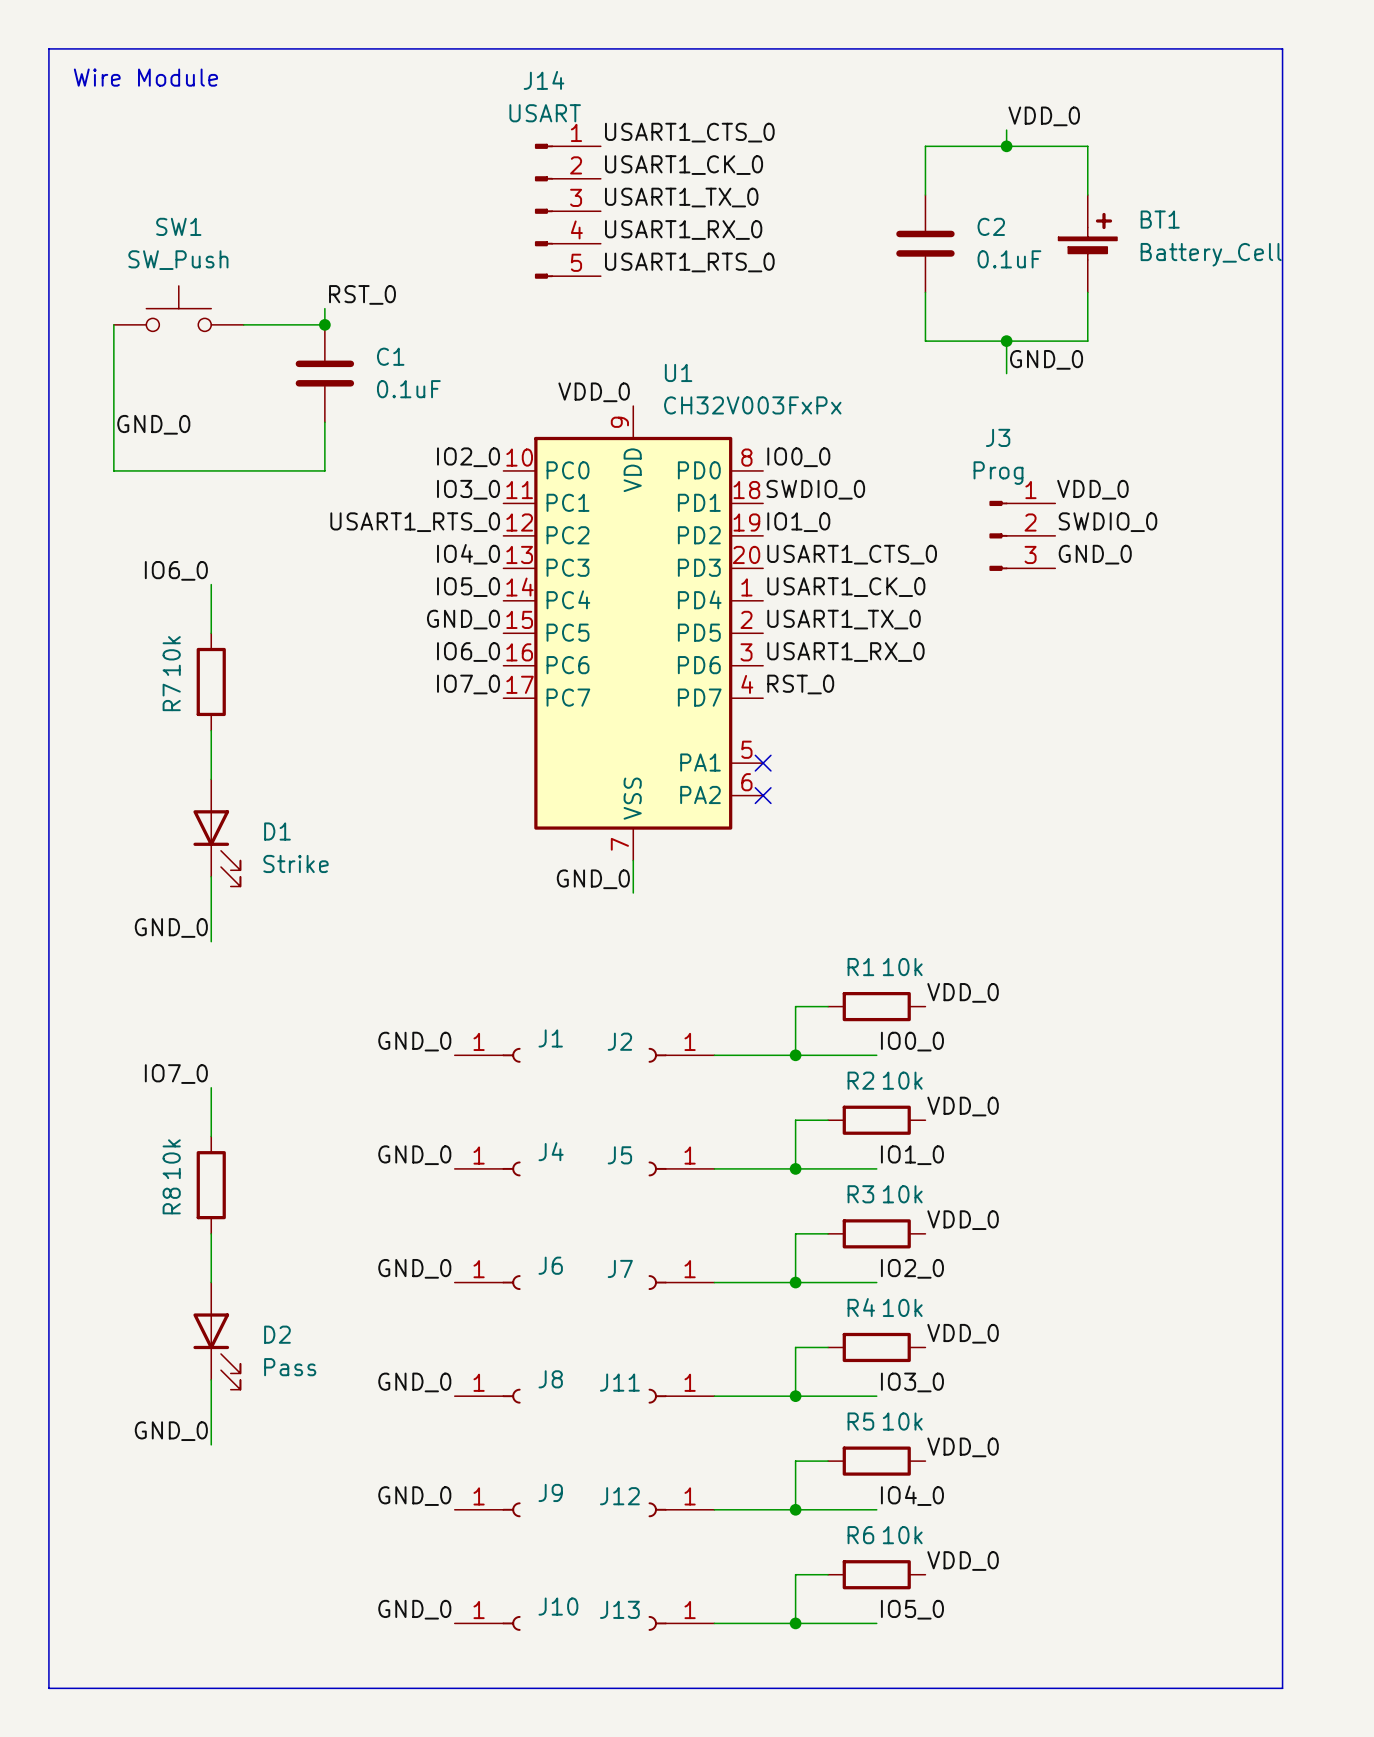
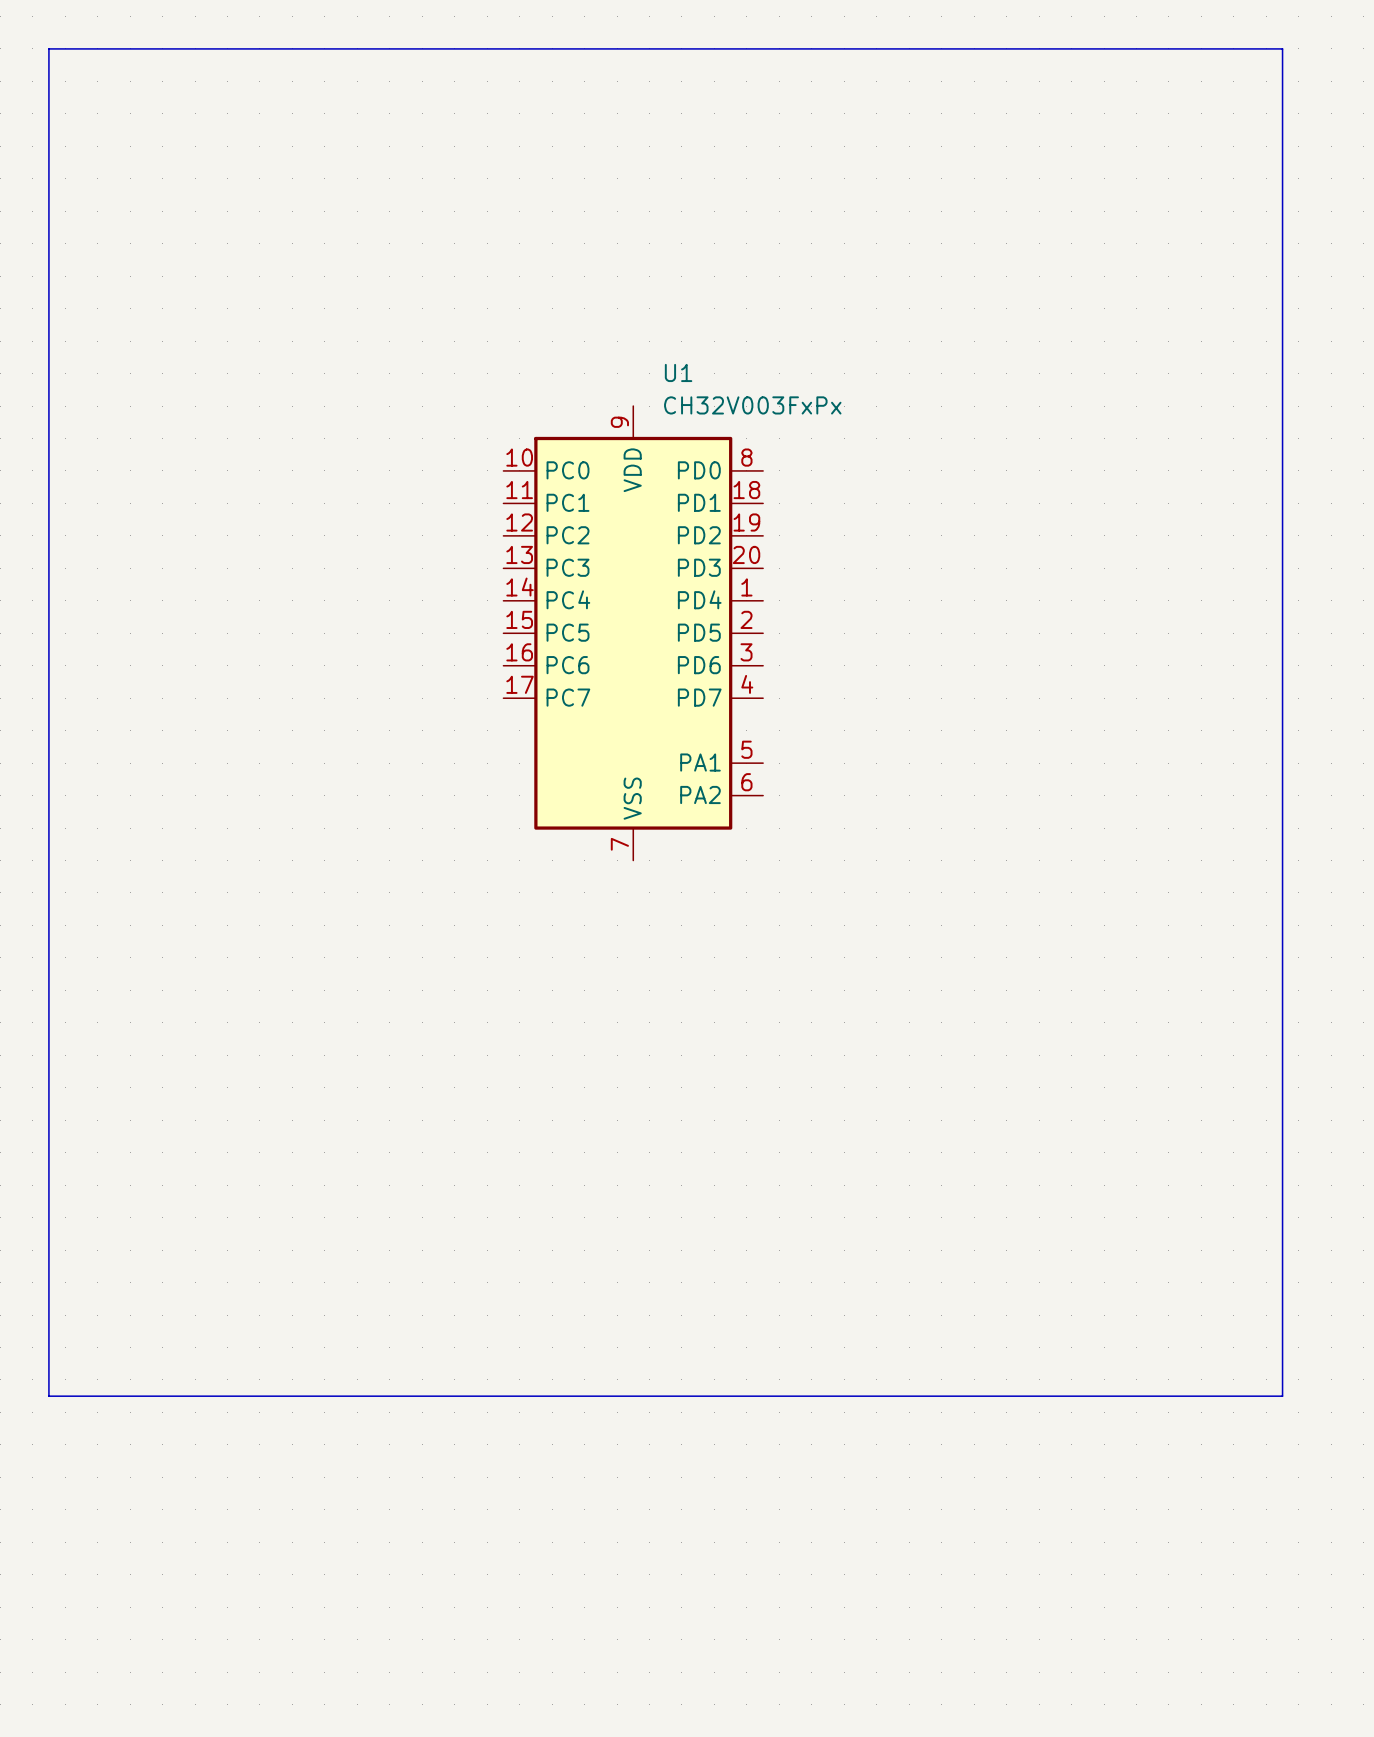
text: Wire Module (145, 77) -> none
label: VDD_0 (1044, 116) -> none
wire: (1006, 130) (1006, 146) -> none
label: USART1_CTS_0 (689, 132) -> none
junction: (1006, 146) -> none
label: USART1_CK_0 (684, 165) -> none
wire: (925, 195) (925, 146) (1087, 146) (1087, 195) -> none
label: USART1_TX_0 (681, 197) -> none
J14: USART (567, 211) -> none
label: USART1_RX_0 (683, 230) -> none
C2: 0.1uF (925, 243) -> none
BT1: Battery_Cell (1087, 243) -> none
label: USART1_RTS_0 (689, 262) -> none
wire: (925, 292) (925, 341) (1087, 341) (1087, 292) -> none
label: RST_0 (362, 294) -> none
SW1: SW_Push (178, 308) -> none
wire: (324, 308) (324, 324) (243, 324) -> none
wire: (113, 324) (113, 470) (324, 470) (324, 422) -> none
junction: (324, 324) -> none
wire: (1006, 341) (1006, 373) -> none
junction: (1006, 341) -> none
label: GND_0 (1046, 359) -> none
C1: 0.1uF (324, 373) -> none
label: VDD_0 (594, 392) -> none
label: GND_0 (153, 424) -> none
label: IO2_0 (468, 457) -> none
label: IO0_0 (798, 457) -> none
label: IO3_0 (468, 489) -> none
label: SWDIO_0 (815, 489) -> none
label: VDD_0 (1092, 489) -> none
label: USART1_RTS_0 (415, 522) -> none
label: IO1_0 (798, 522) -> none
label: SWDIO_0 (1107, 522) -> none
J3: Prog (1022, 535) -> none
label: IO4_0 (468, 554) -> none
label: USART1_CTS_0 (852, 554) -> none
label: GND_0 (1095, 554) -> none
label: IO6_0 (176, 570) -> none
wire: (211, 584) (211, 633) -> none
label: IO5_0 (468, 587) -> none
label: USART1_CK_0 (846, 587) -> none
label: GND_0 (463, 619) -> none
label: USART1_TX_0 (844, 619) -> none
label: IO6_0 (468, 652) -> none
label: USART1_RX_0 (845, 652) -> none
R7: 10k (211, 681) -> none
label: IO7_0 (468, 684) -> none
label: RST_0 (800, 684) -> none
wire: (211, 730) (211, 779) -> none
no-connect mark: (763, 763) -> none
no-connect mark: (763, 795) -> none
D1: Strike (216, 832) -> none
wire: (633, 860) (633, 892) -> none
wire: (211, 876) (211, 941) -> none
label: GND_0 (593, 879) -> none
label: GND_0 (171, 927) -> none
label: VDD_0 (963, 992) -> none
wire: (828, 1006) (795, 1006) (795, 1055) -> none
R1: 10k (876, 1006) -> none
label: GND_0 (414, 1041) -> none
label: IO0_0 (912, 1041) -> none
J1: (487, 1055) -> none
J2: (681, 1055) -> none
wire: (714, 1055) (876, 1055) -> none
junction: (795, 1055) -> none
label: IO7_0 (176, 1074) -> none
wire: (211, 1087) (211, 1136) -> none
label: VDD_0 (963, 1106) -> none
wire: (828, 1120) (795, 1120) (795, 1168) -> none
R2: 10k (876, 1120) -> none
label: GND_0 (414, 1155) -> none
label: IO1_0 (912, 1155) -> none
J4: (487, 1168) -> none
J5: (681, 1168) -> none
wire: (714, 1168) (876, 1168) -> none
junction: (795, 1168) -> none
R8: 10k (211, 1185) -> none
label: VDD_0 (963, 1220) -> none
wire: (211, 1233) (211, 1282) -> none
wire: (828, 1233) (795, 1233) (795, 1282) -> none
R3: 10k (876, 1233) -> none
label: GND_0 (414, 1268) -> none
label: IO2_0 (912, 1268) -> none
J6: (487, 1282) -> none
J7: (681, 1282) -> none
wire: (714, 1282) (876, 1282) -> none
junction: (795, 1282) -> none
label: VDD_0 (963, 1333) -> none
D2: Pass (216, 1336) -> none
wire: (828, 1347) (795, 1347) (795, 1396) -> none
R4: 10k (876, 1347) -> none
wire: (211, 1379) (211, 1444) -> none
label: GND_0 (414, 1382) -> none
label: IO3_0 (912, 1382) -> none
line: (48, 1396) (48, 1688) (1282, 1688) (1282, 1396) -> (48, 1396) (1282, 1396)
J8: (487, 1396) -> none
J11: (681, 1396) -> none
junction: (795, 1396) -> none
label: GND_0 (171, 1431) -> none
label: VDD_0 (963, 1447) -> none
wire: (828, 1461) (795, 1461) (795, 1509) -> none
R5: 10k (876, 1461) -> none
label: IO4_0 (912, 1495) -> none
label: GND_0 (414, 1496) -> none
J9: (487, 1509) -> none
J12: (681, 1509) -> none
wire: (714, 1509) (876, 1509) -> none
junction: (795, 1509) -> none
label: VDD_0 (963, 1561) -> none
wire: (828, 1574) (795, 1574) (795, 1623) -> none
R6: 10k (876, 1574) -> none
label: GND_0 (414, 1609) -> none
label: IO5_0 (912, 1609) -> none
J10: (487, 1623) -> none
J13: (681, 1623) -> none
wire: (714, 1623) (876, 1623) -> none
junction: (795, 1623) -> none

